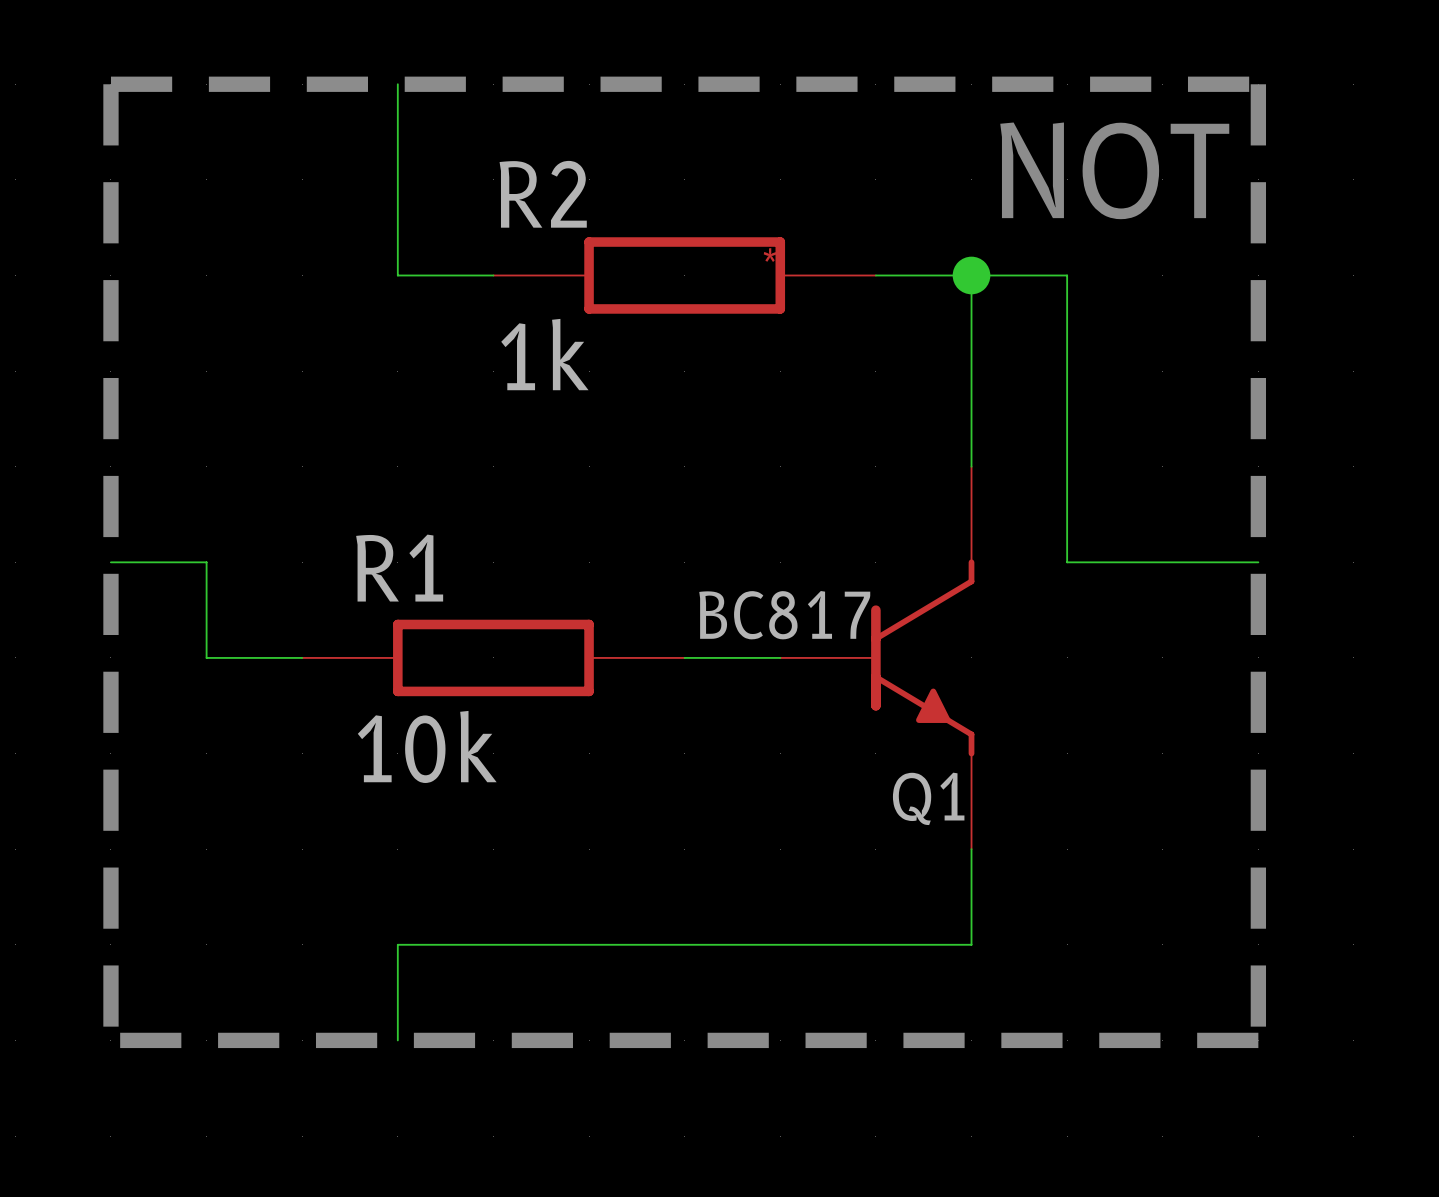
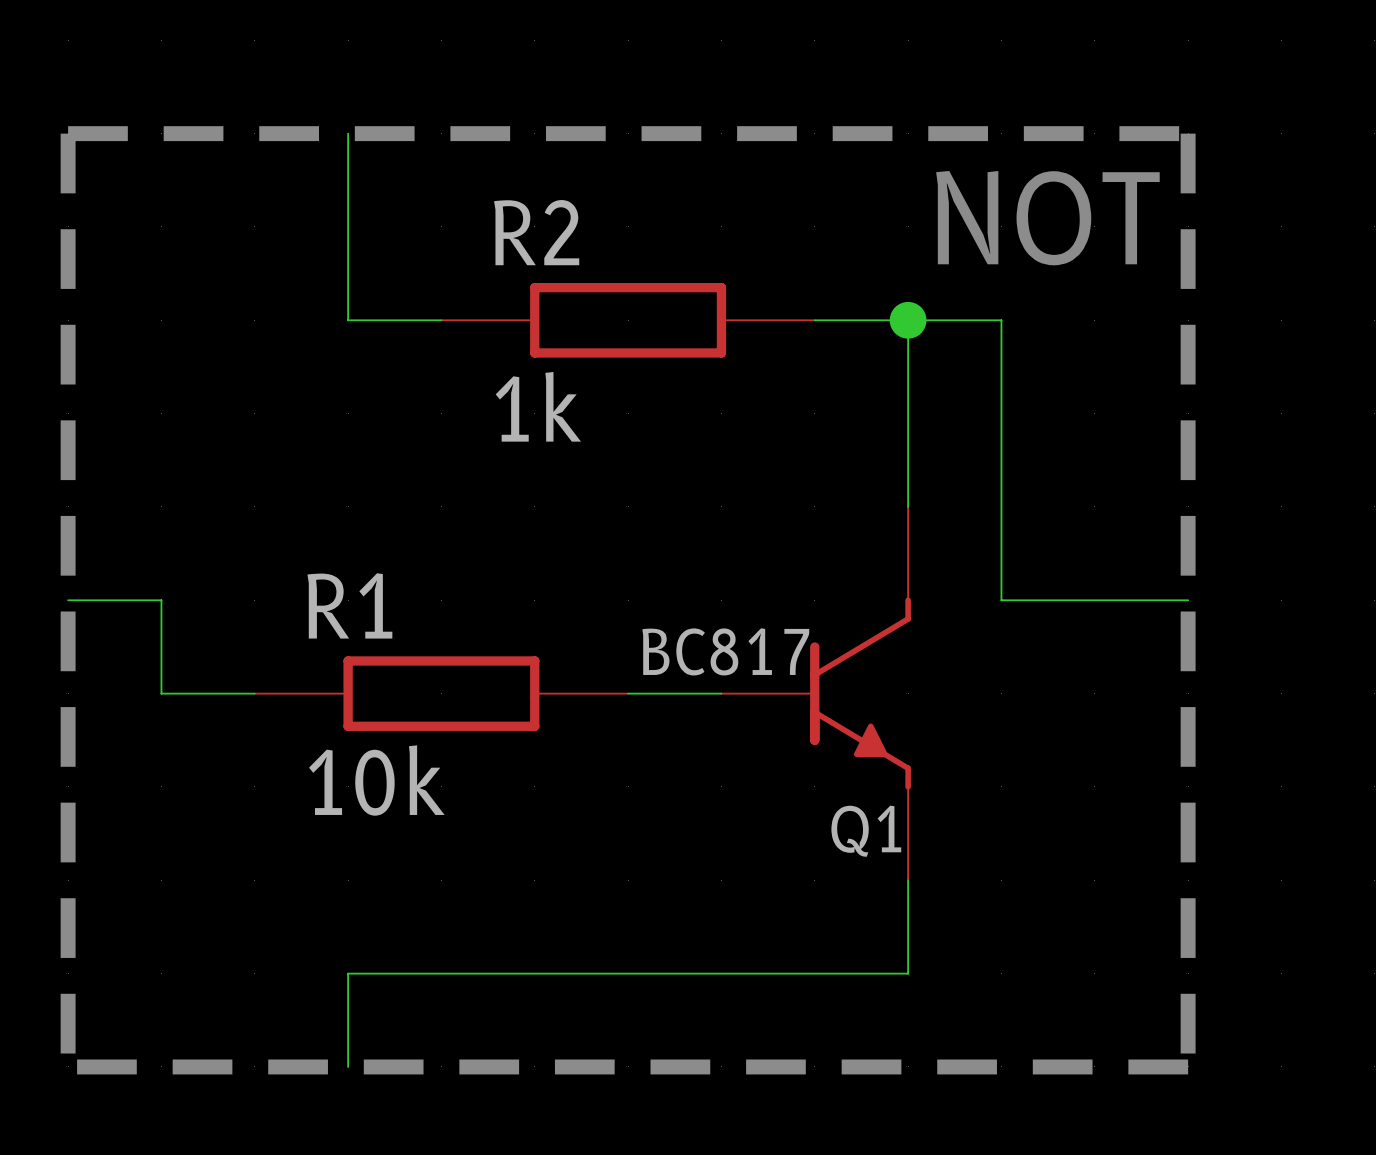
R2 name position: R2 (543, 194) -> R2 (536, 232)
R2 text: * (770, 255) -> none
R2 value position: 1k (544, 354) -> 1k (538, 406)

